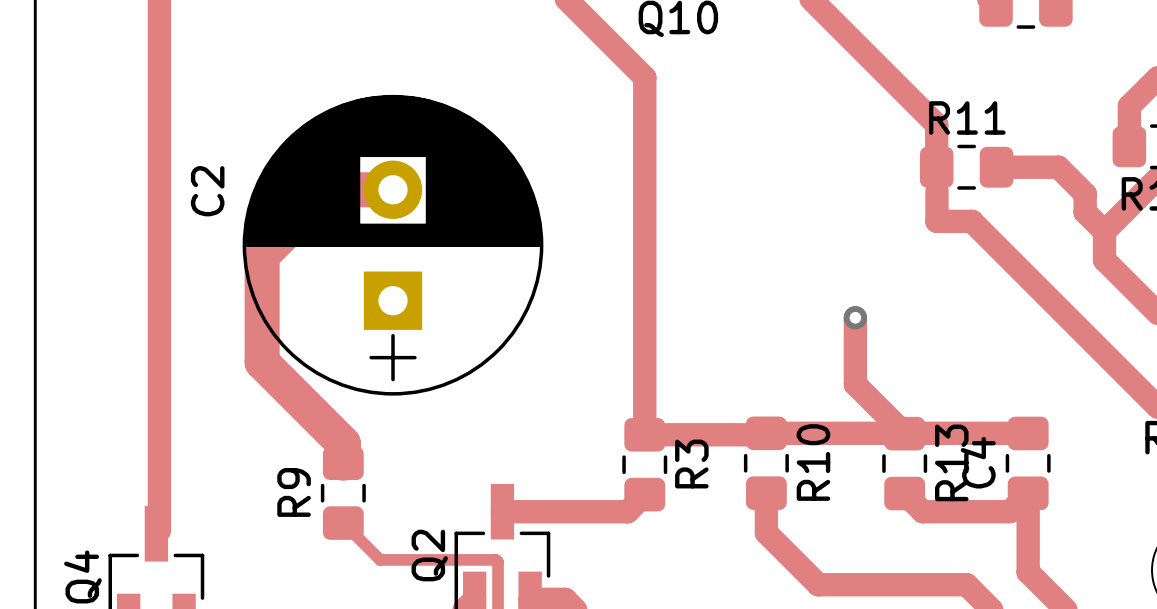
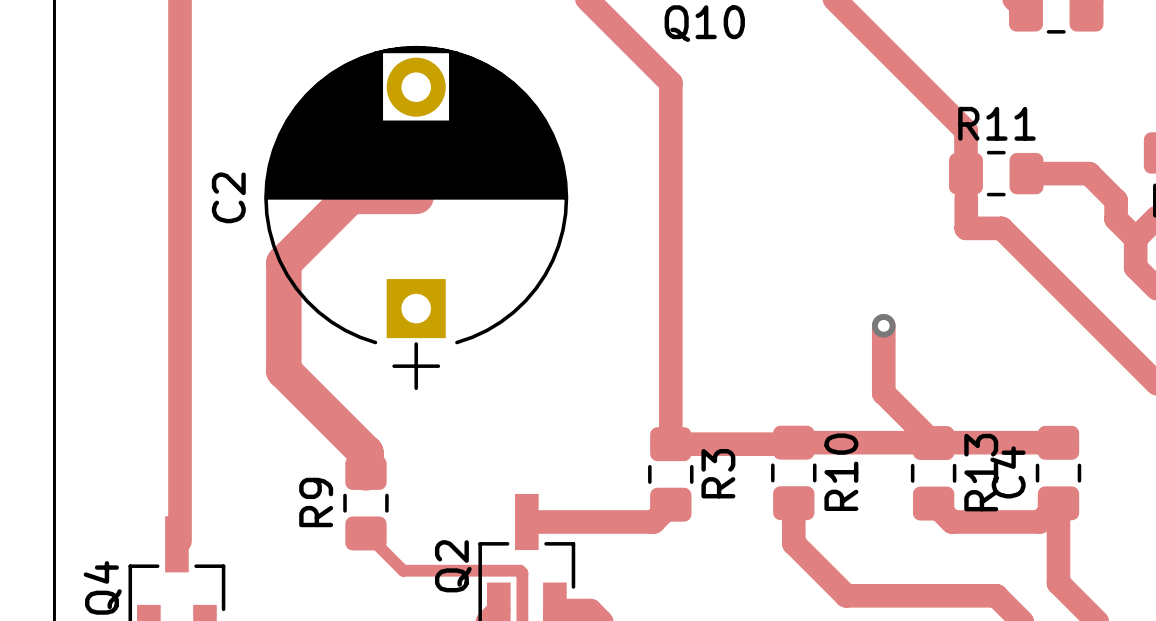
C2 footprint: [242, 94, 544, 396] -> [264, 45, 569, 391]

